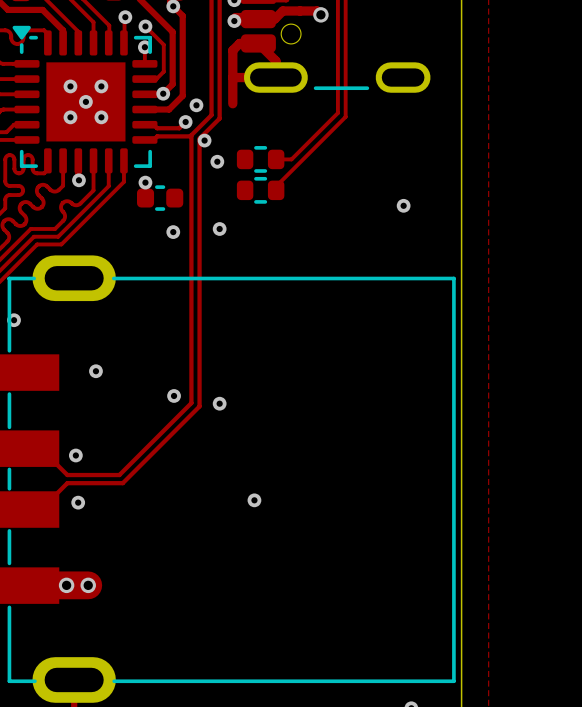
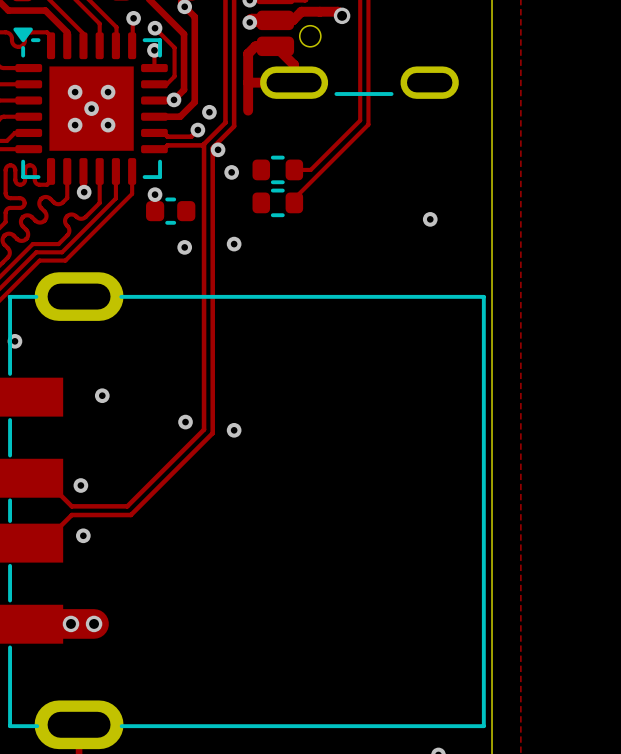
via: (254, 500) -> none

